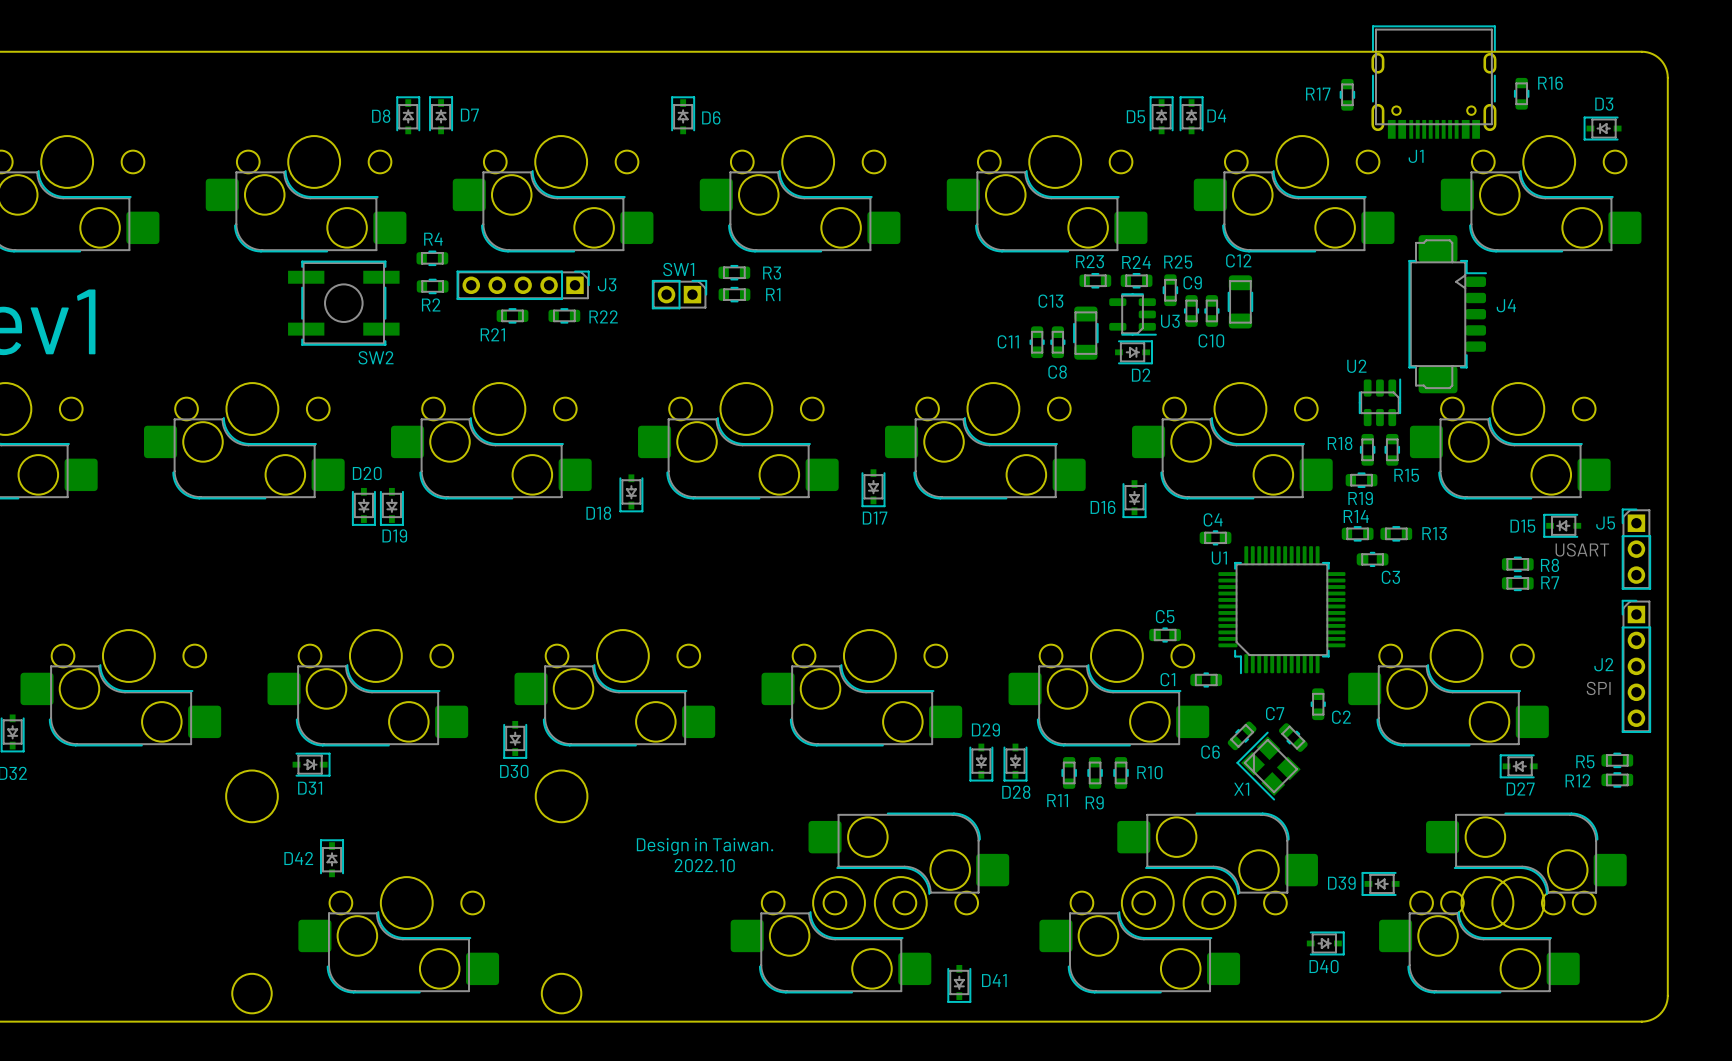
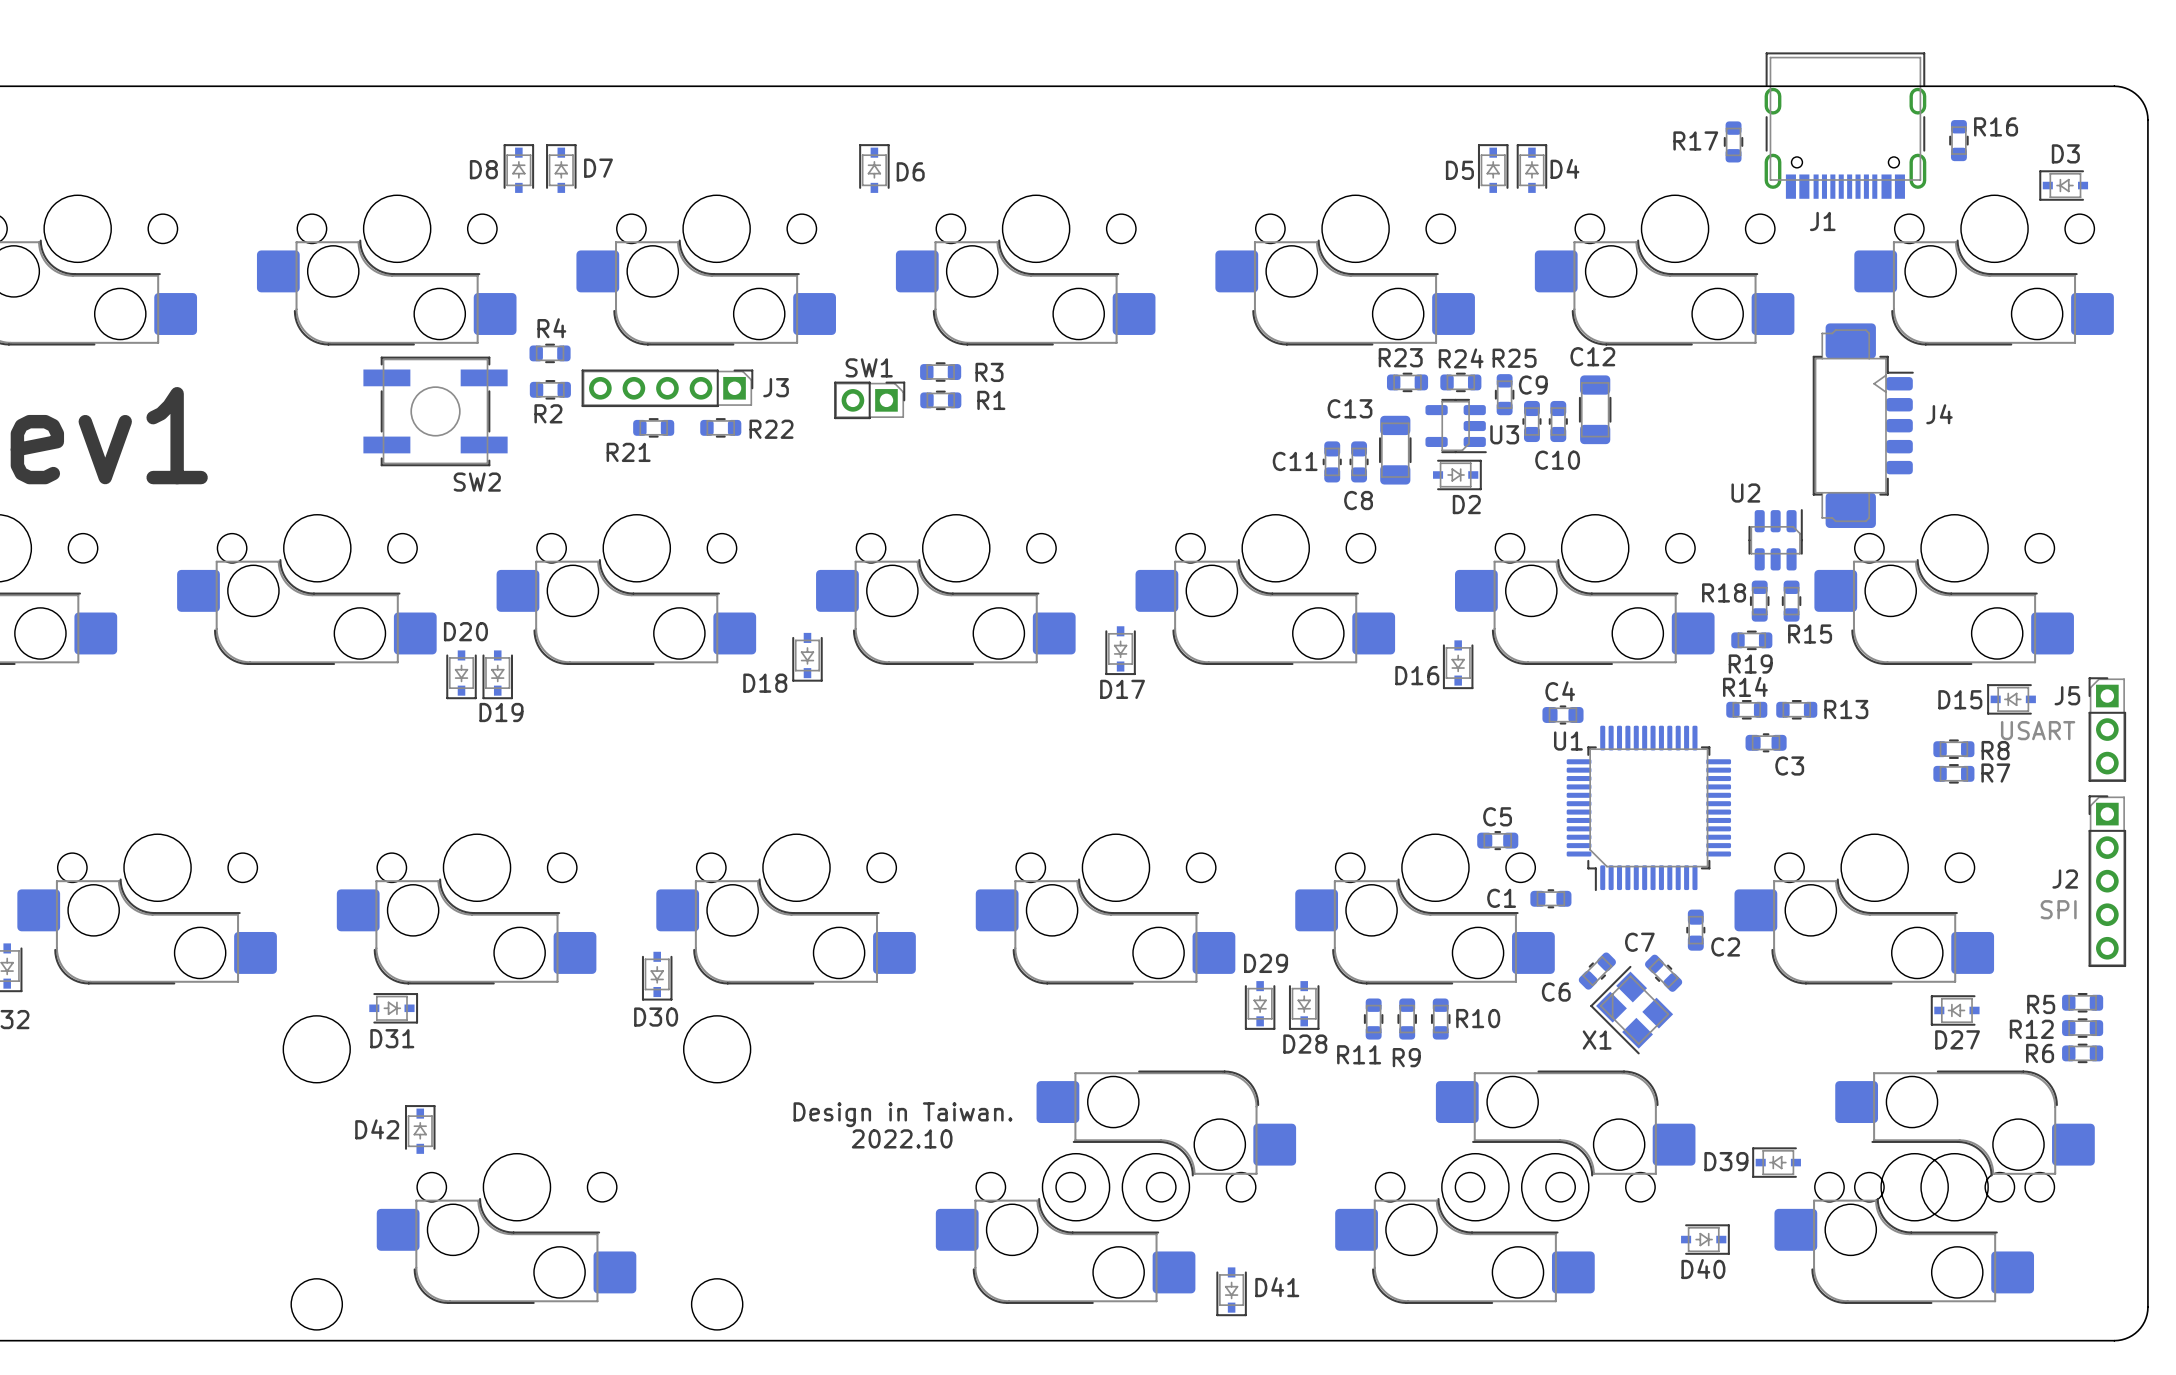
R6: none -> (2082, 1053)

